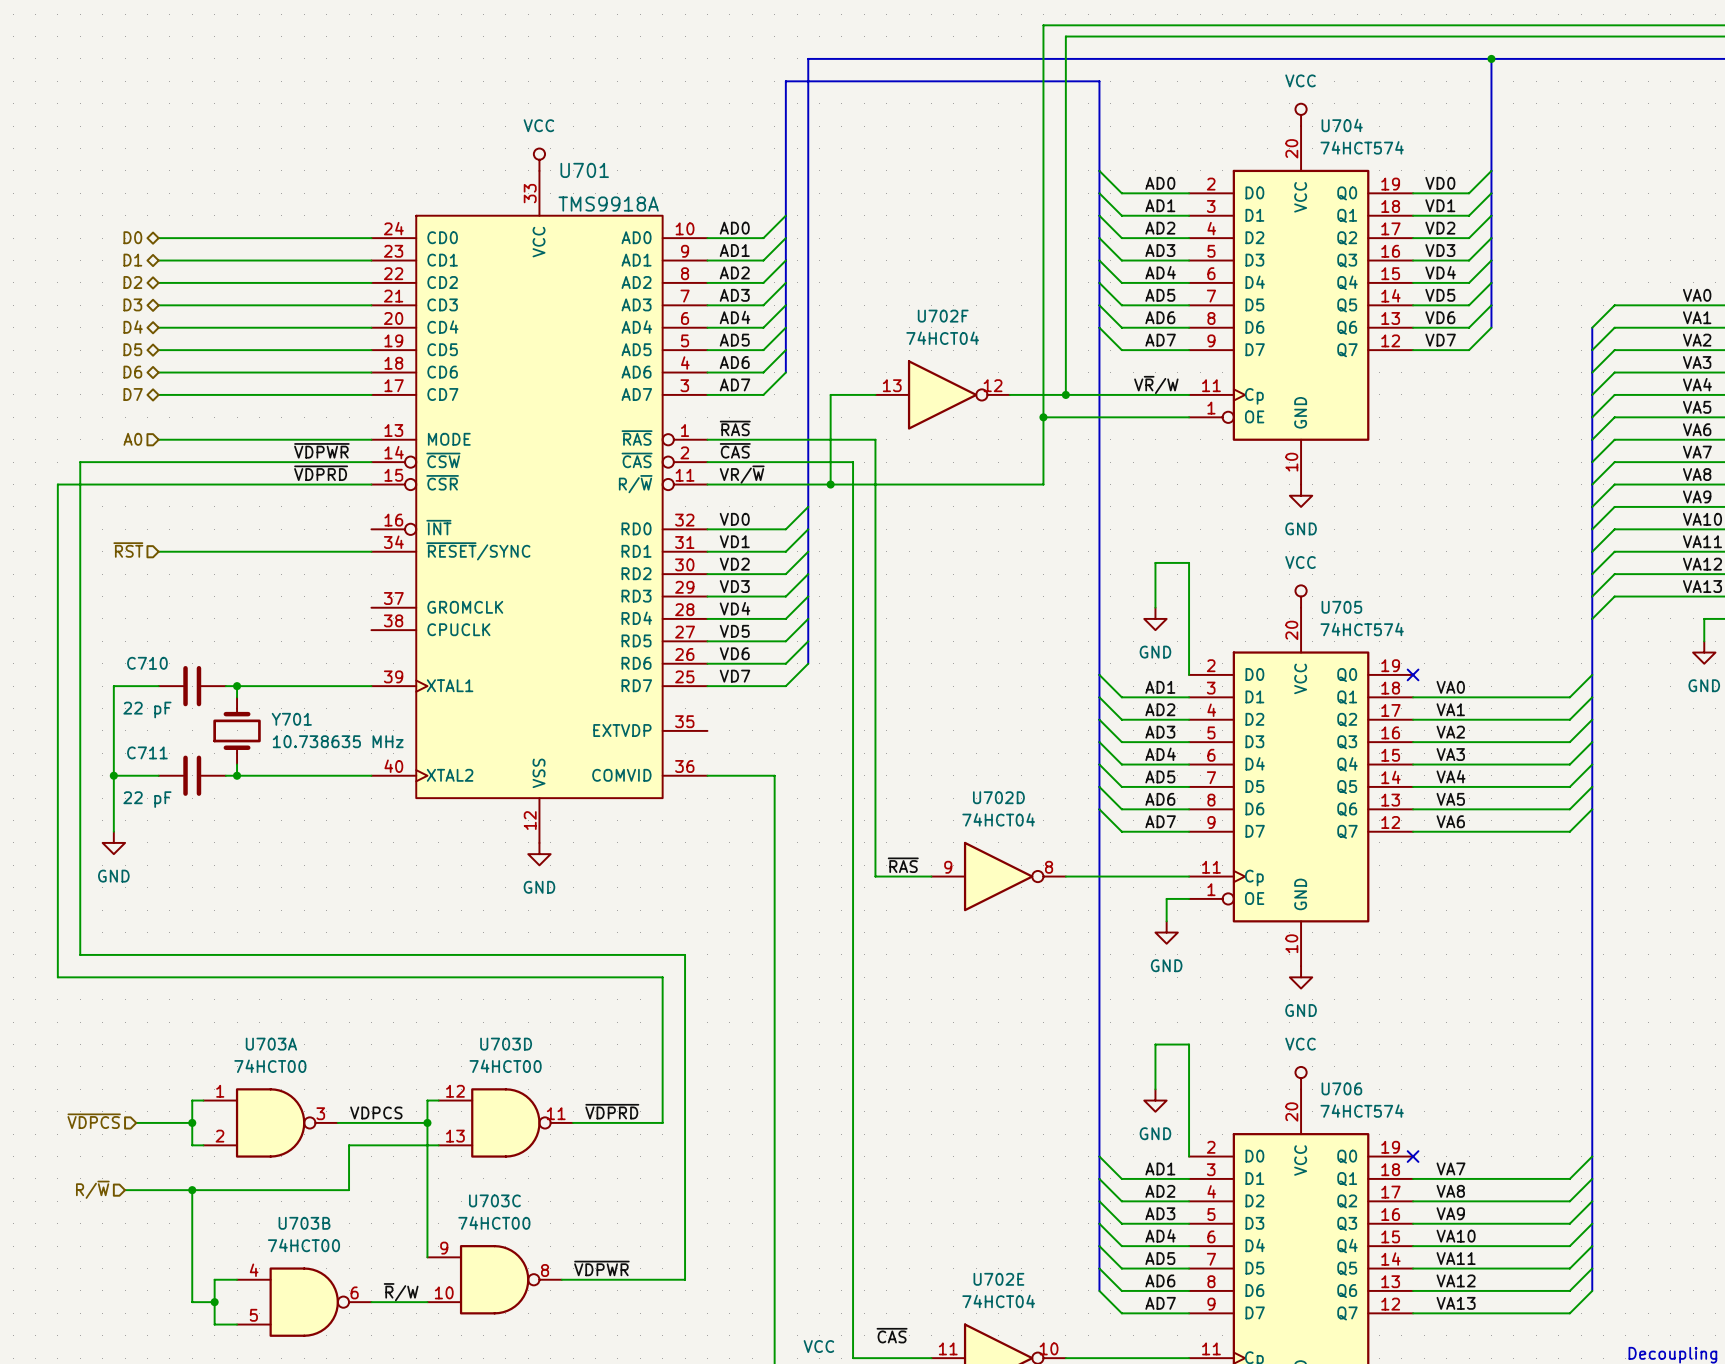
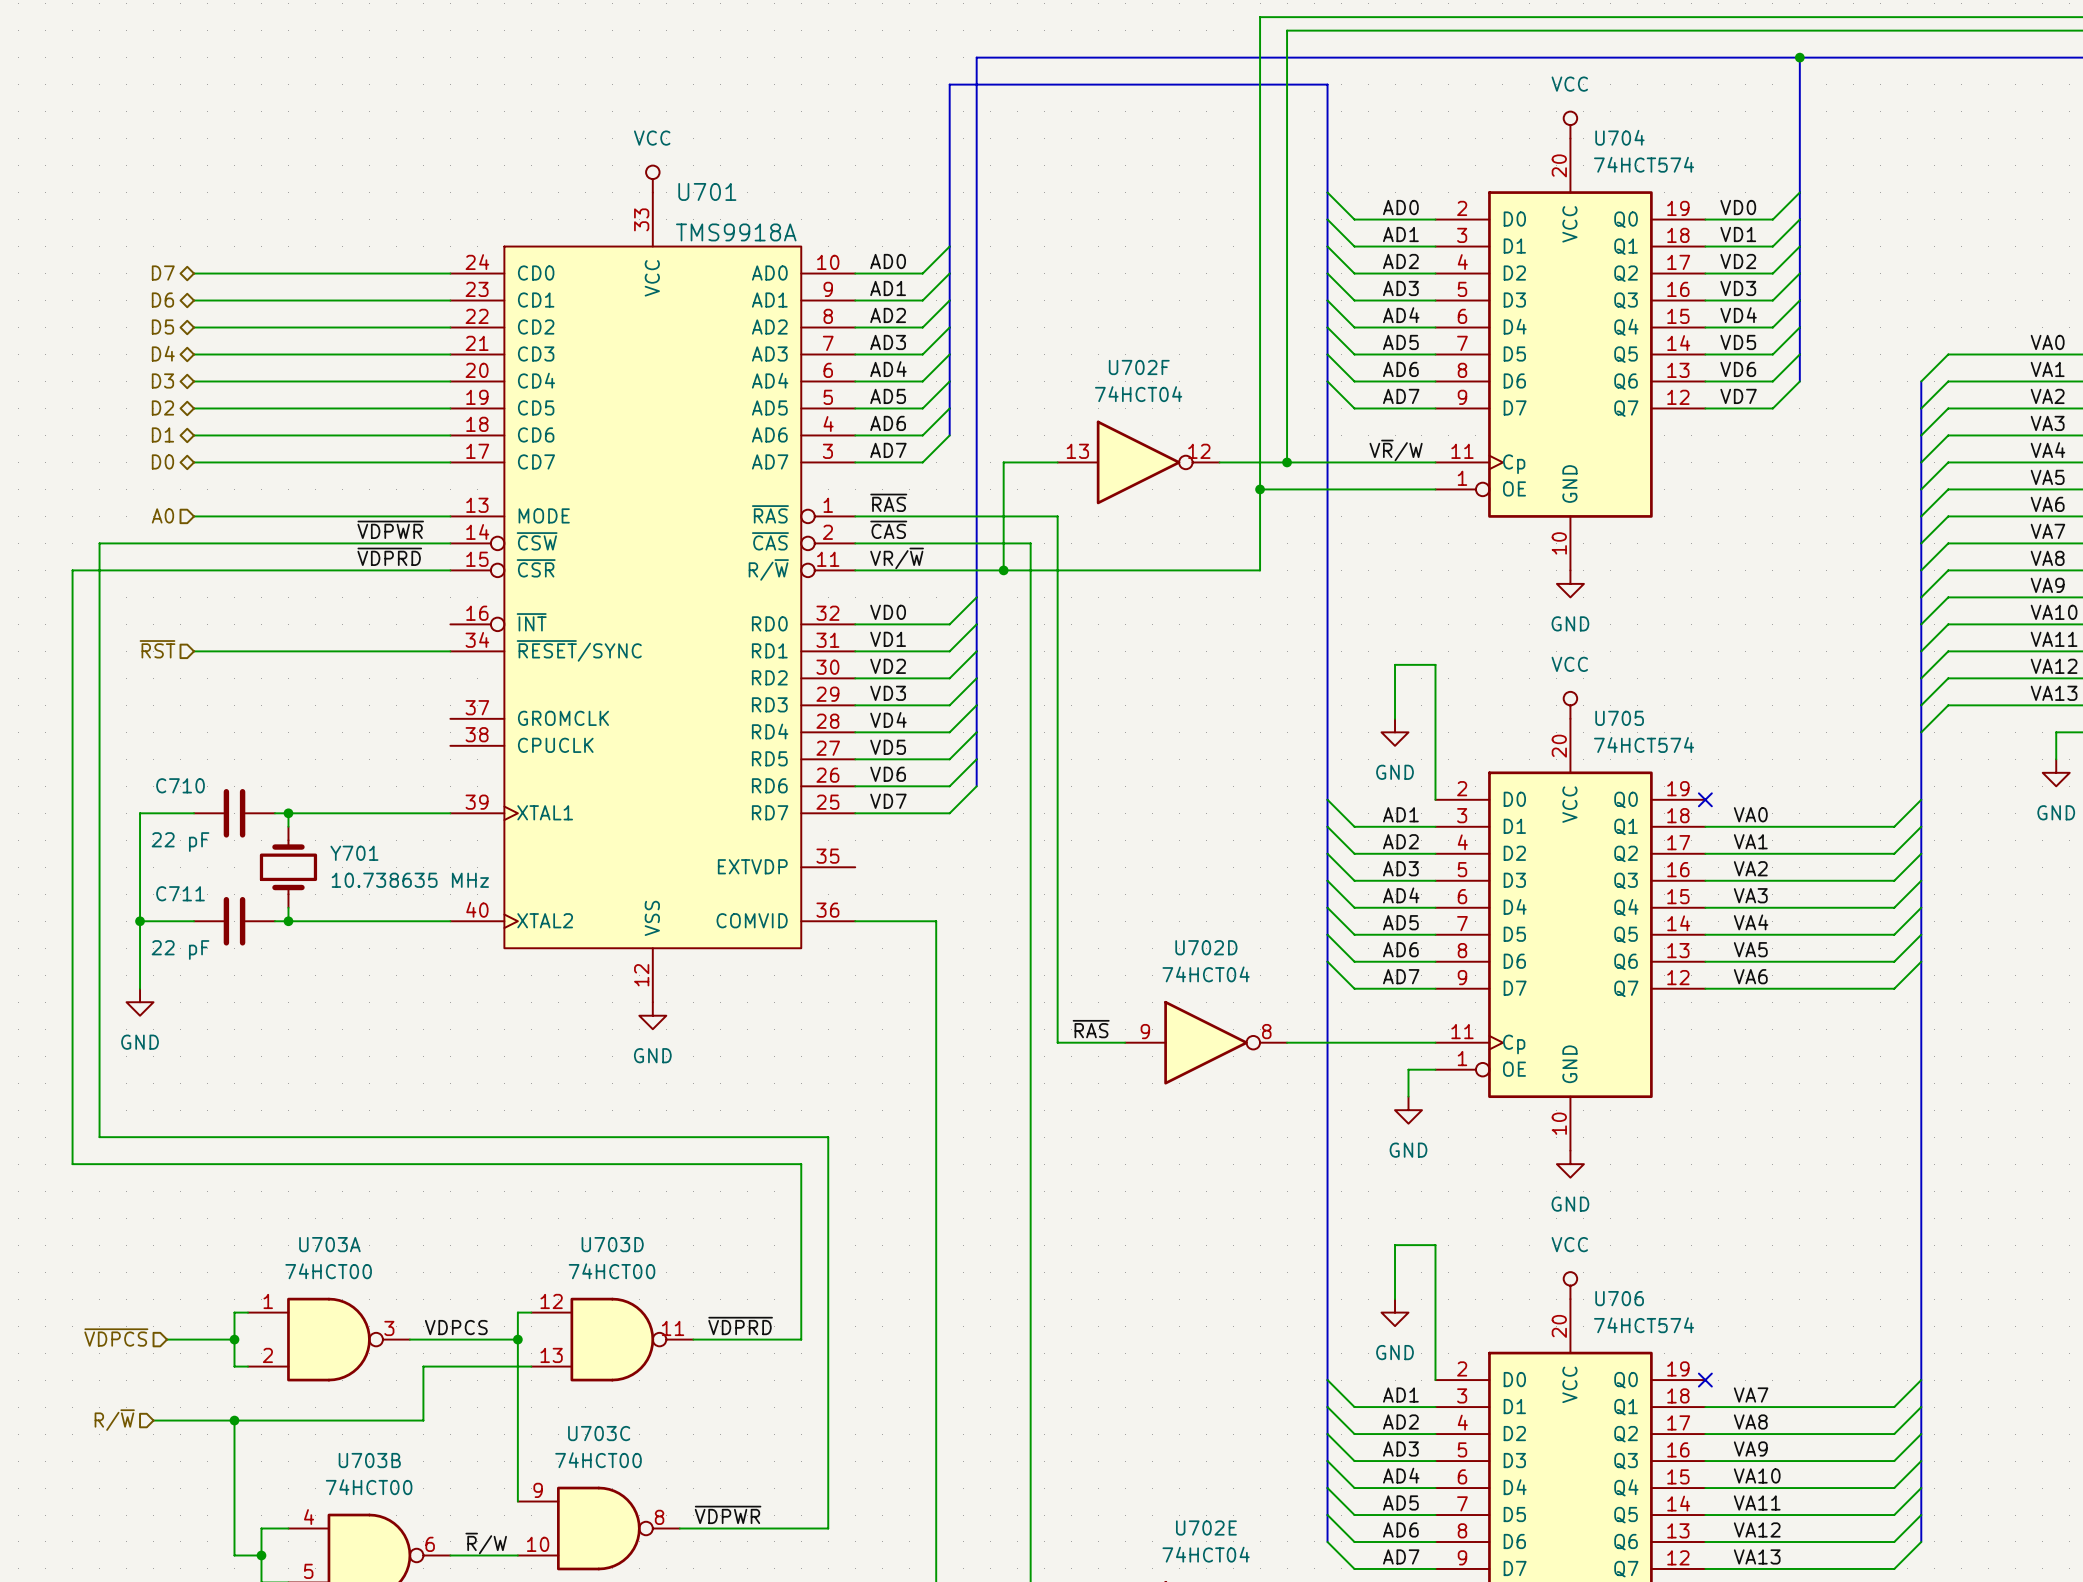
hierarchical label: D0 (132, 237) -> D7 (163, 273)
hierarchical label: D1 (132, 260) -> D6 (162, 300)
hierarchical label: D2 (132, 282) -> D5 (162, 327)
hierarchical label: D3 (132, 304) -> D4 (163, 353)
hierarchical label: D4 (133, 327) -> D3 (162, 380)
hierarchical label: D5 (132, 349) -> D2 (162, 407)
hierarchical label: D6 (132, 372) -> D1 (162, 434)
hierarchical label: D7 (133, 394) -> D0 (162, 461)

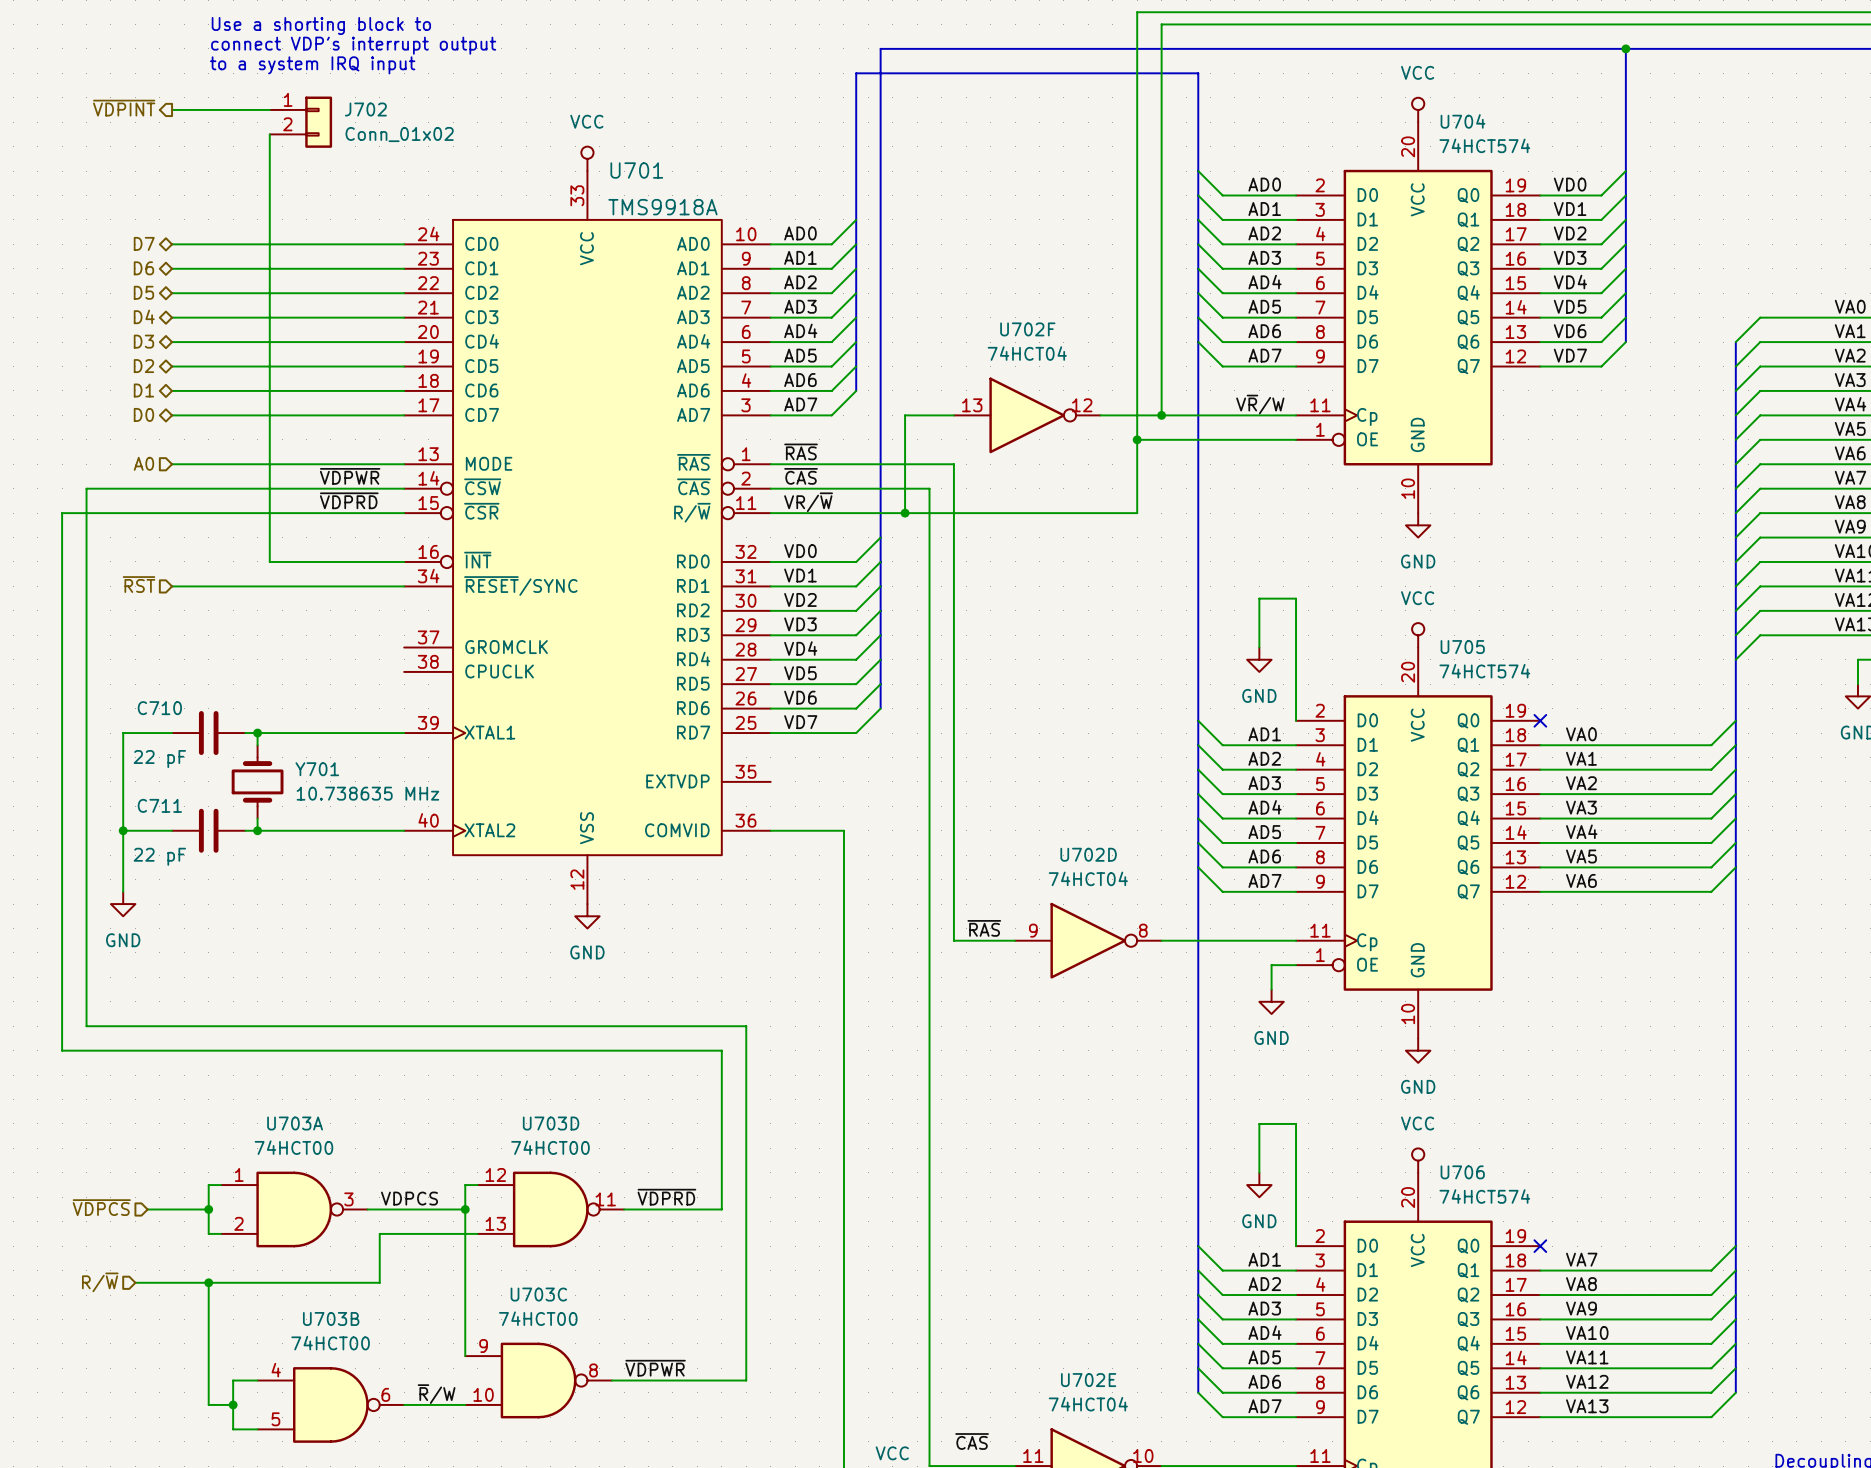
text: none -> Use a shorting block to (321, 26)
text: none -> connect VDP's interrupt output (353, 45)
text: none -> to a system IRQ input (312, 65)
hierarchical label: none -> ~{VDPINT} (124, 108)
wire: none -> (172, 109) (269, 109)
J702: none -> Conn_01x02 (300, 122)
wire: none -> (269, 134) (269, 561) (404, 561)

